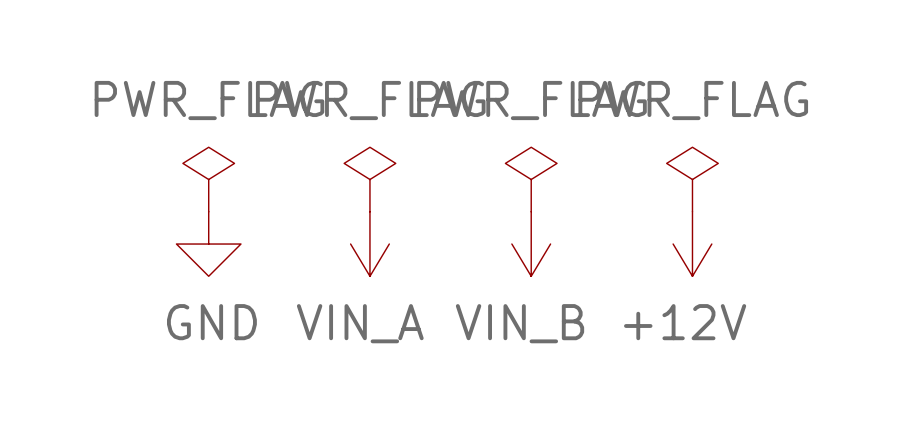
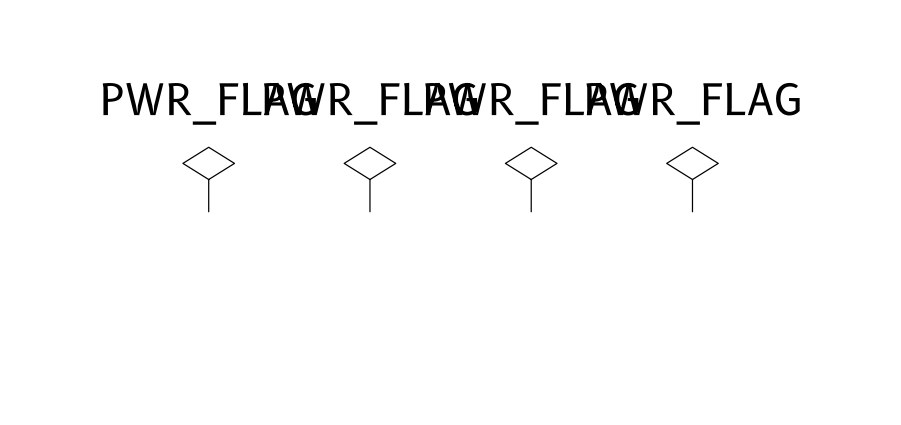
power symbol: GND (208, 244) -> none
power symbol: VIN_A (369, 244) -> none
power symbol: VIN_B (531, 244) -> none
power symbol: +12V (692, 244) -> none

